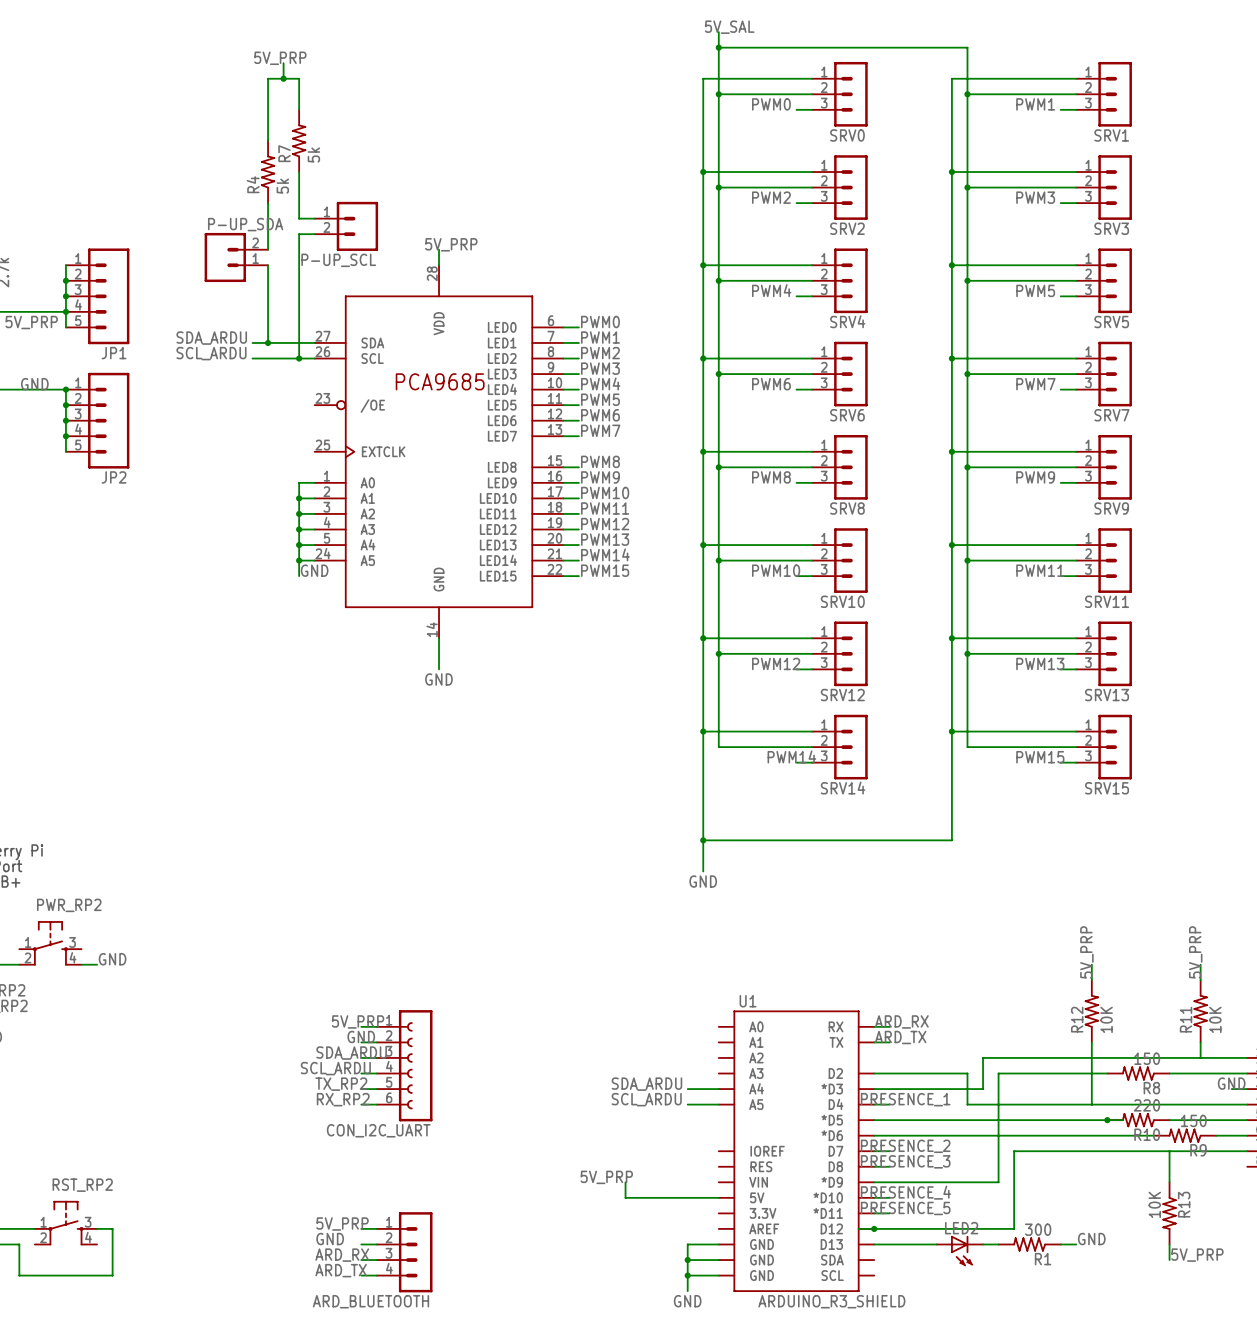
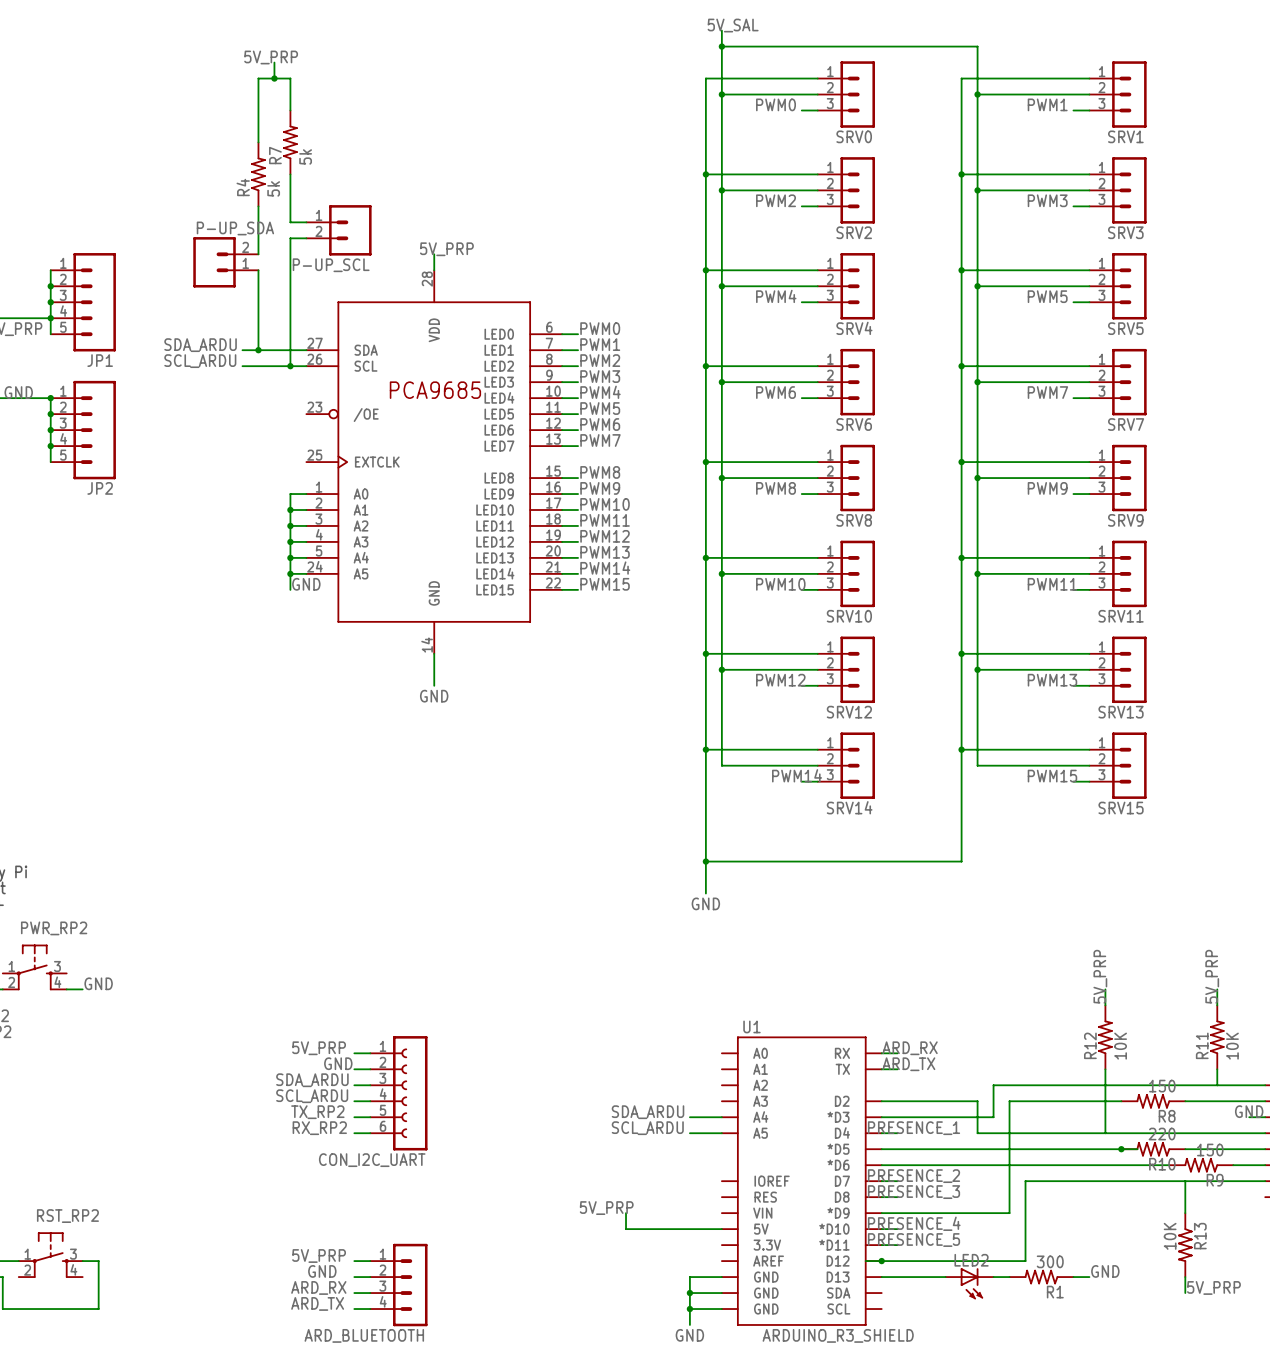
label position: 5V_PRP (358, 1021) -> 5V_PRP (319, 1048)
label position: GND (361, 1036) -> GND (338, 1063)
label position: SDA_ARDU (351, 1053) -> SDA_ARDU (312, 1080)
label position: SCL_ARDU (335, 1068) -> SCL_ARDU (312, 1096)
label position: TX_RP2 (341, 1084) -> TX_RP2 (317, 1112)
label position: RX_RP2 (343, 1099) -> RX_RP2 (319, 1128)
label position: 5V_PRP (342, 1224) -> 5V_PRP (319, 1256)
label position: ARD_RX (342, 1255) -> ARD_RX (318, 1287)
label position: ARD_TX (341, 1270) -> ARD_TX (317, 1303)

